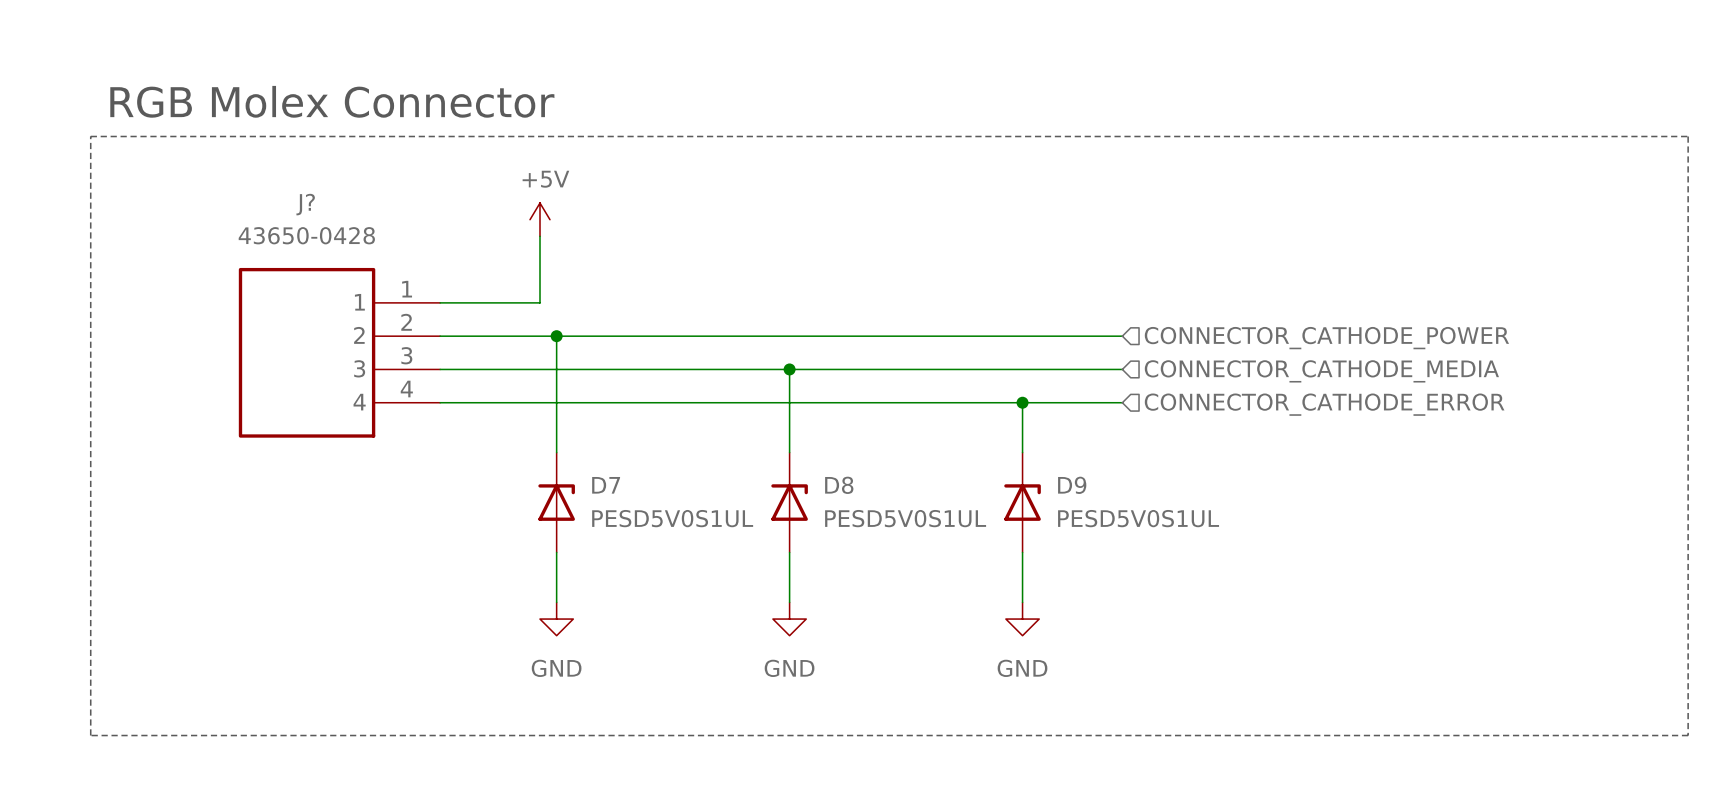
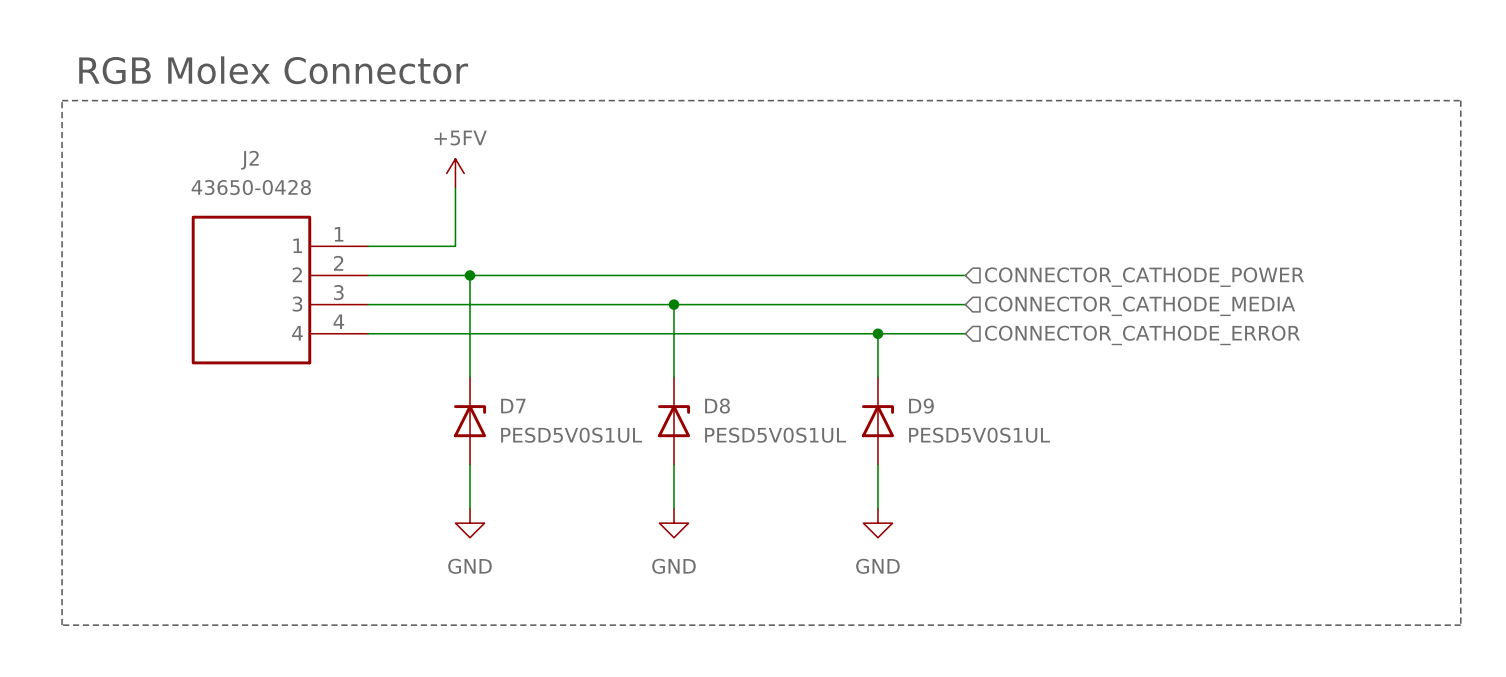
J? name: J? (305, 204) -> J2 (249, 160)
power symbol: +5V (540, 219) -> +5FV (455, 173)

